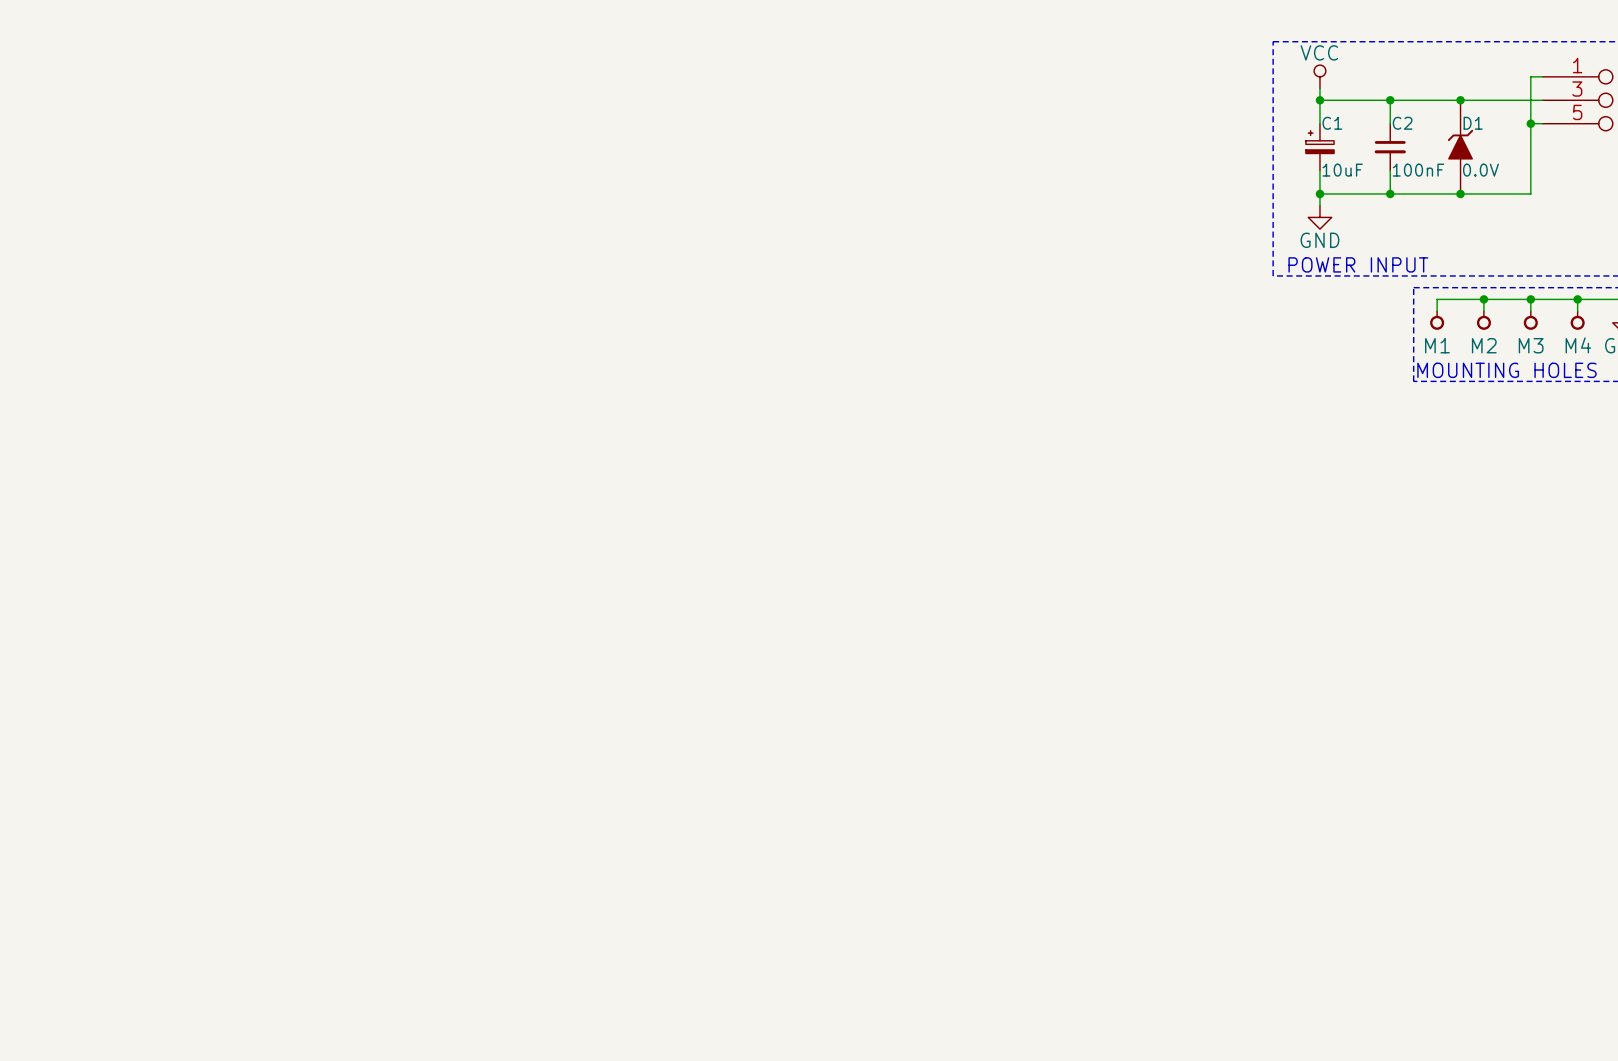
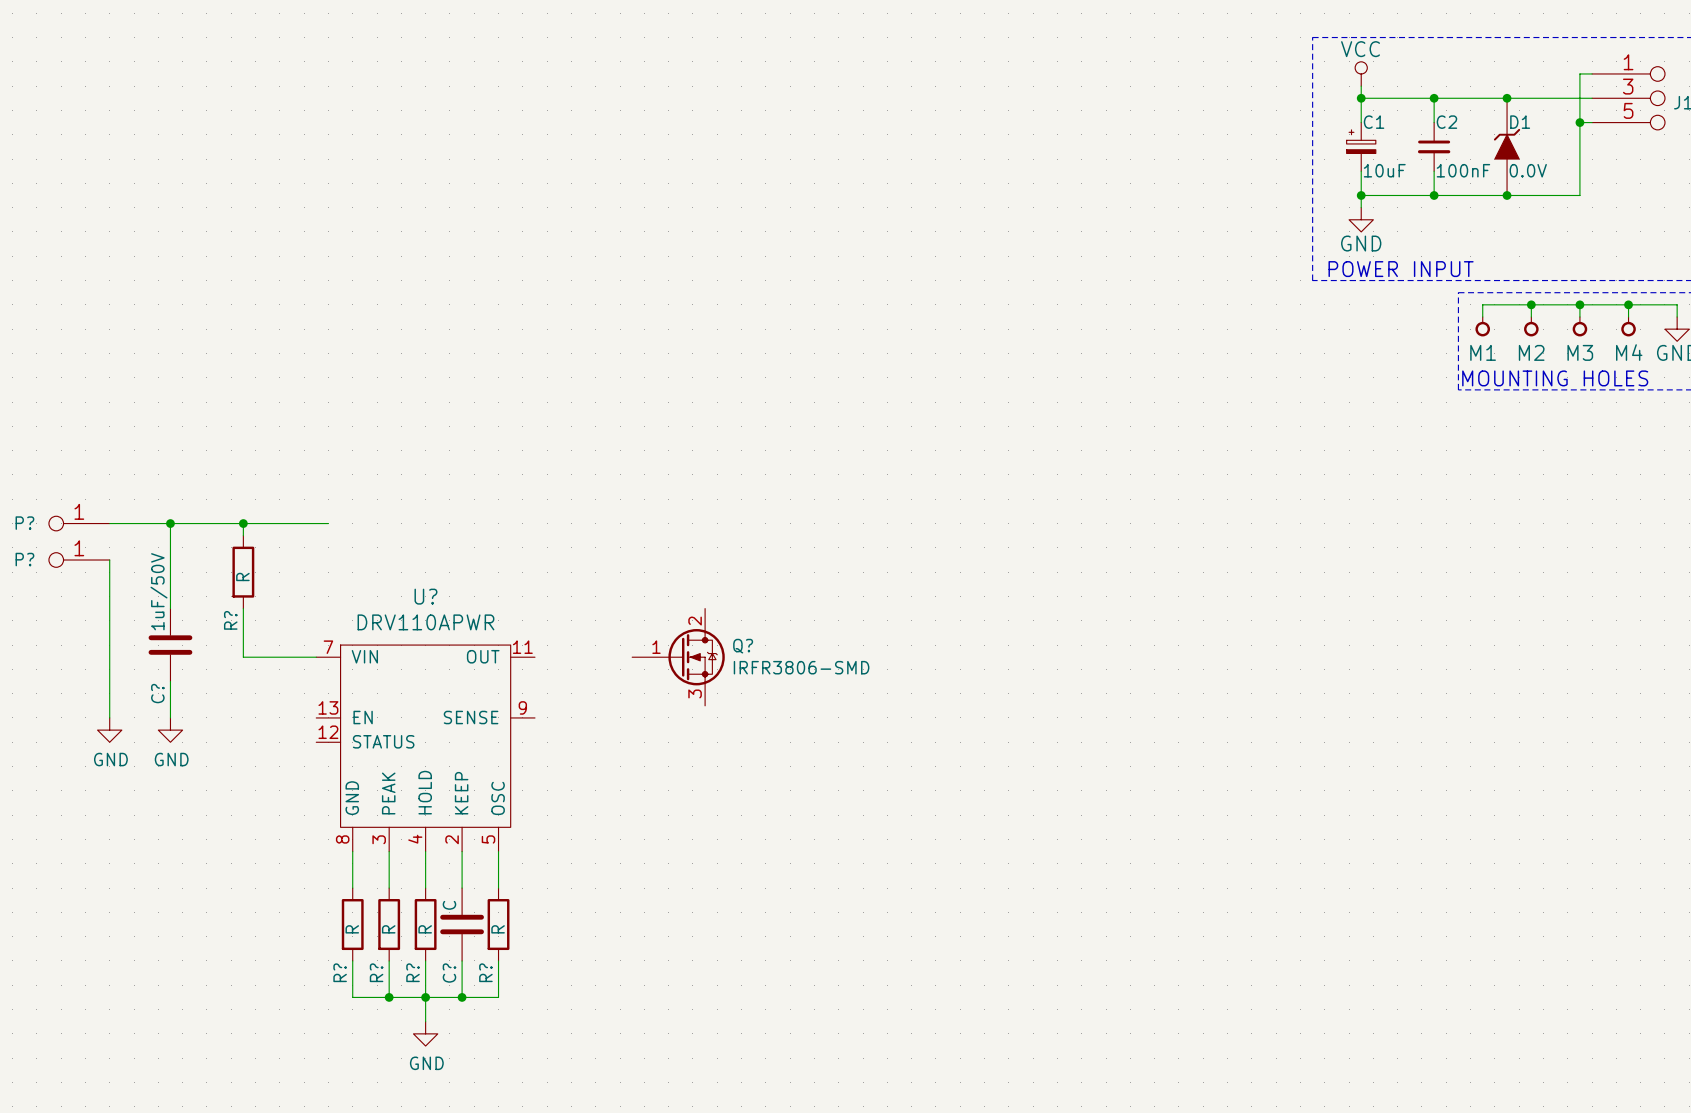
P?: none -> (79, 523)
wire: none -> (109, 523) (328, 523)
wire: none -> (170, 523) (170, 608)
junction: none -> (170, 523)
wire: none -> (243, 523) (243, 535)
junction: none -> (243, 523)
P?: none -> (79, 560)
wire: none -> (109, 560) (109, 717)
R?: none -> R (243, 572)
wire: none -> (243, 608) (243, 657) (316, 657)
C?: none -> 1uF/50V (170, 645)
Q?: none -> IRFR3806-SMD (678, 657)
wire: none -> (170, 681) (170, 717)
power symbol: none -> GND (109, 730)
power symbol: none -> GND (170, 730)
U?: none -> DRV110APWR (425, 748)
wire: none -> (352, 851) (352, 888)
wire: none -> (389, 851) (389, 888)
wire: none -> (425, 851) (425, 888)
wire: none -> (462, 851) (462, 888)
wire: none -> (498, 851) (498, 888)
R?: none -> R (352, 924)
R?: none -> R (389, 924)
R?: none -> R (425, 924)
C?: none -> C (462, 924)
R?: none -> R (498, 924)
wire: none -> (352, 960) (352, 997) (498, 997) (498, 960)
wire: none -> (389, 960) (389, 997)
wire: none -> (425, 960) (425, 1021)
wire: none -> (462, 960) (462, 997)
junction: none -> (389, 997)
junction: none -> (425, 997)
junction: none -> (462, 997)
power symbol: none -> GND (425, 1033)

